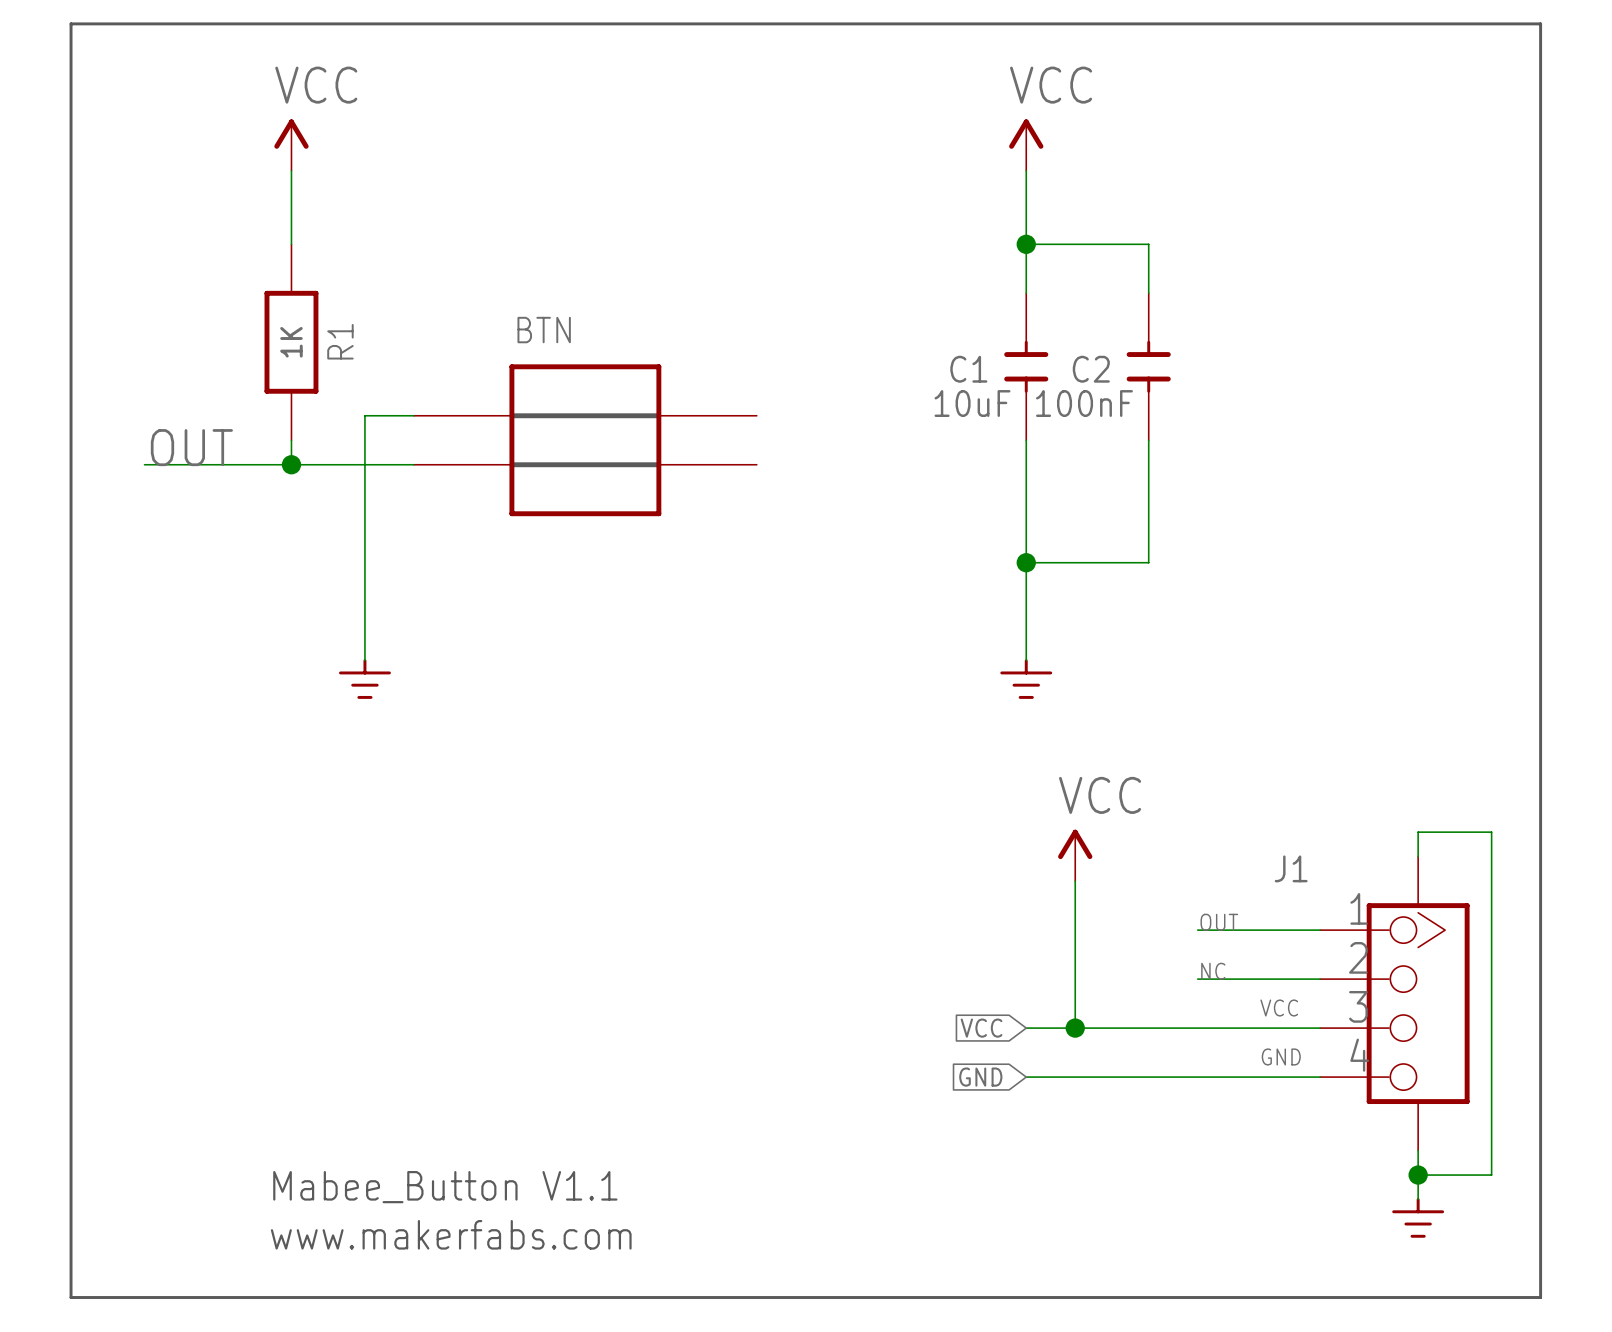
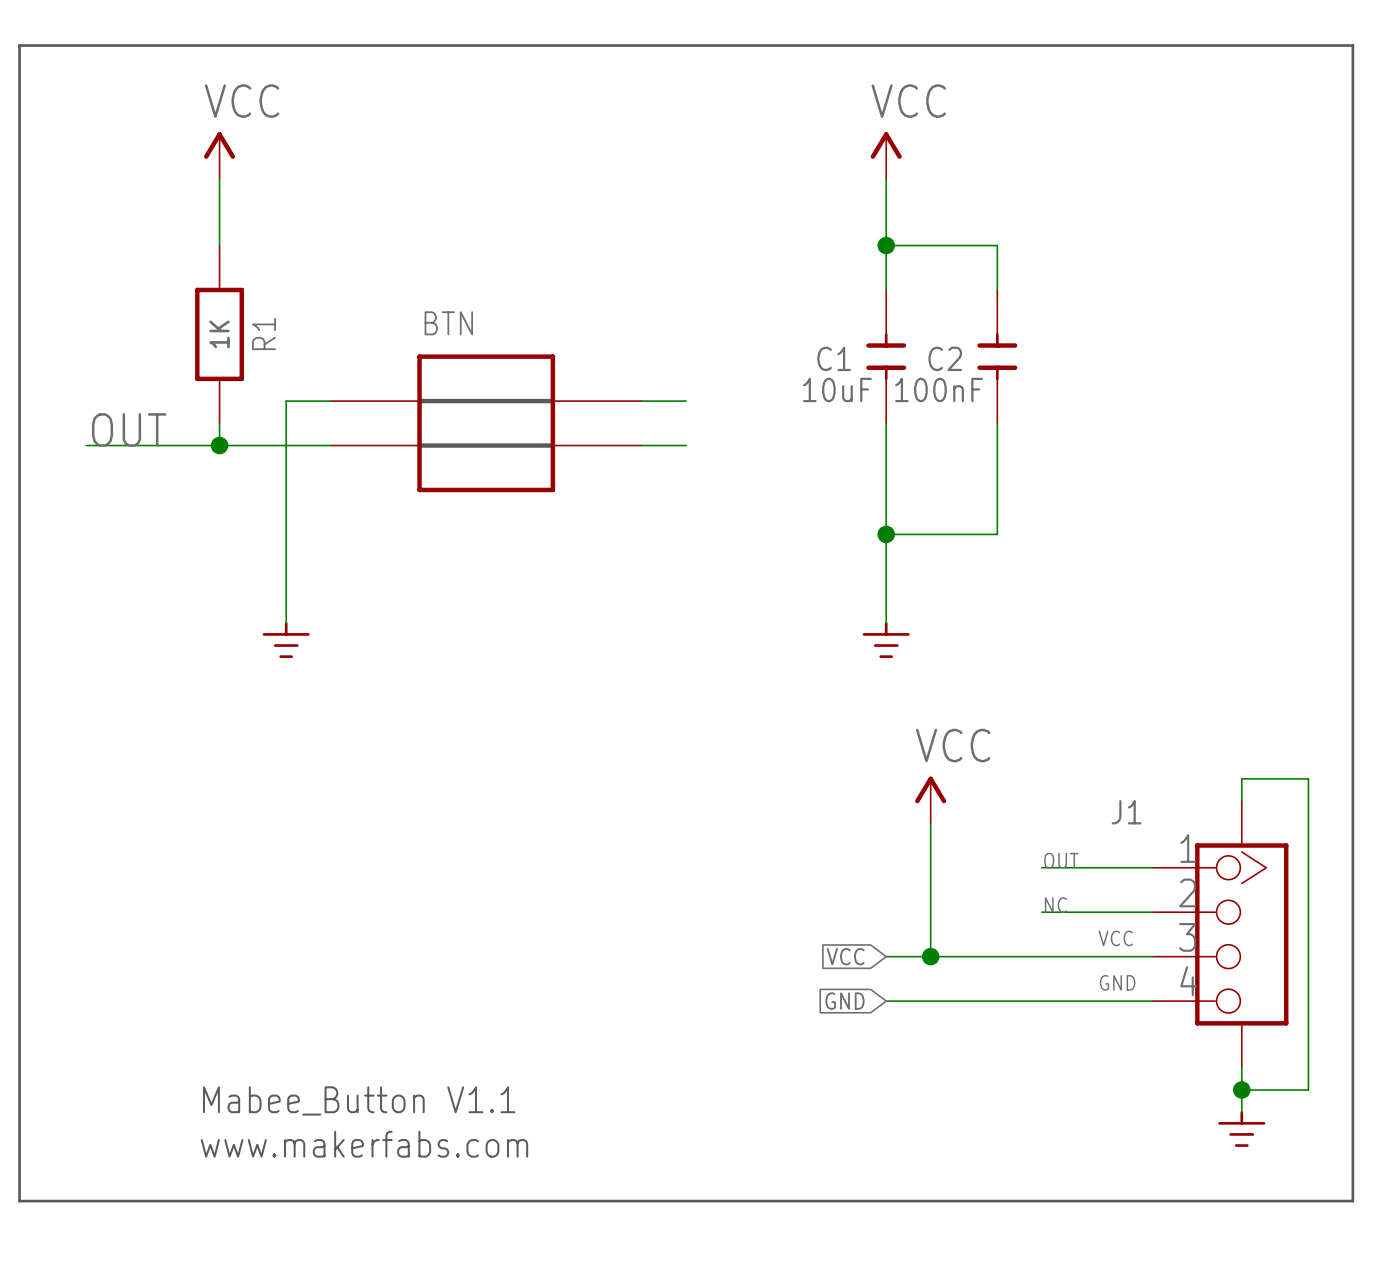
wire: none -> (641, 401) (686, 401)
wire: none -> (641, 445) (686, 445)

